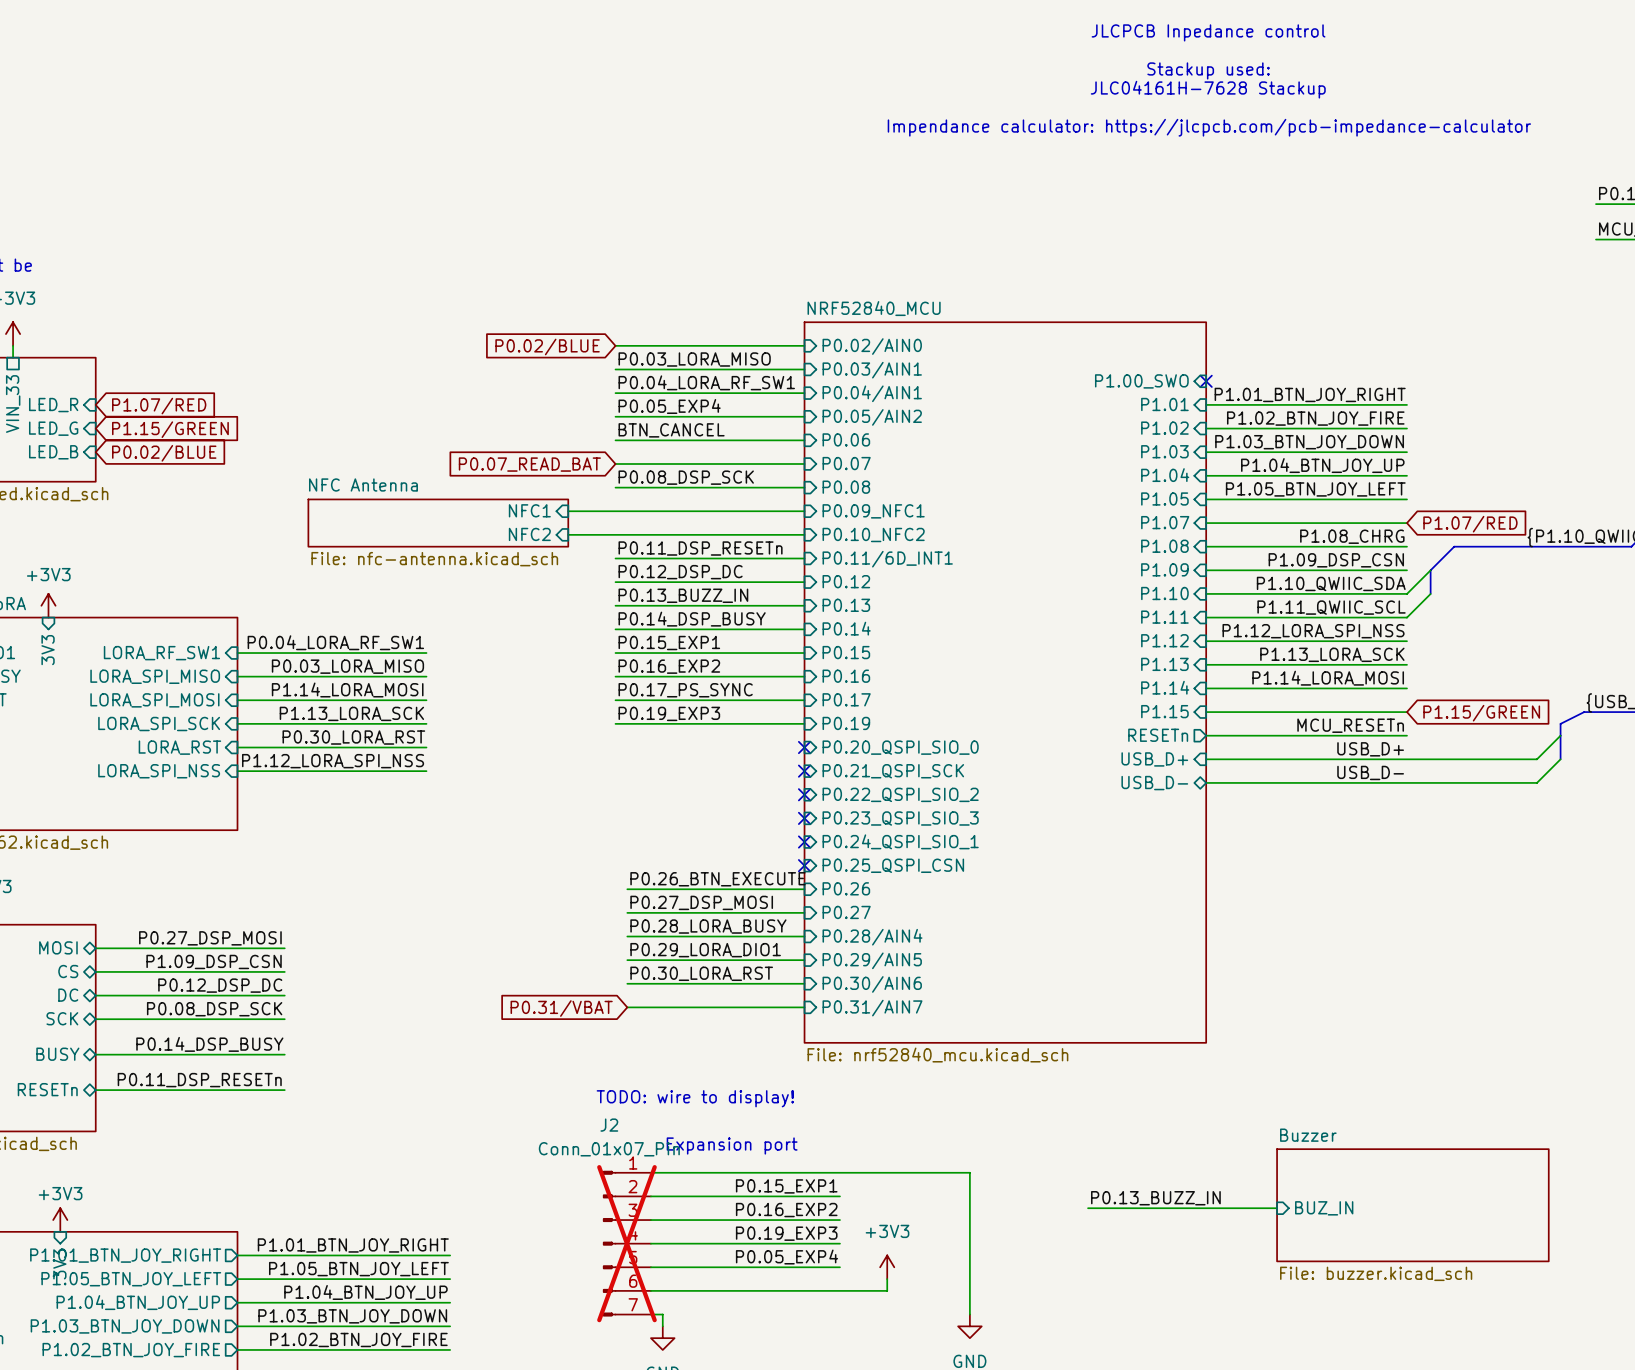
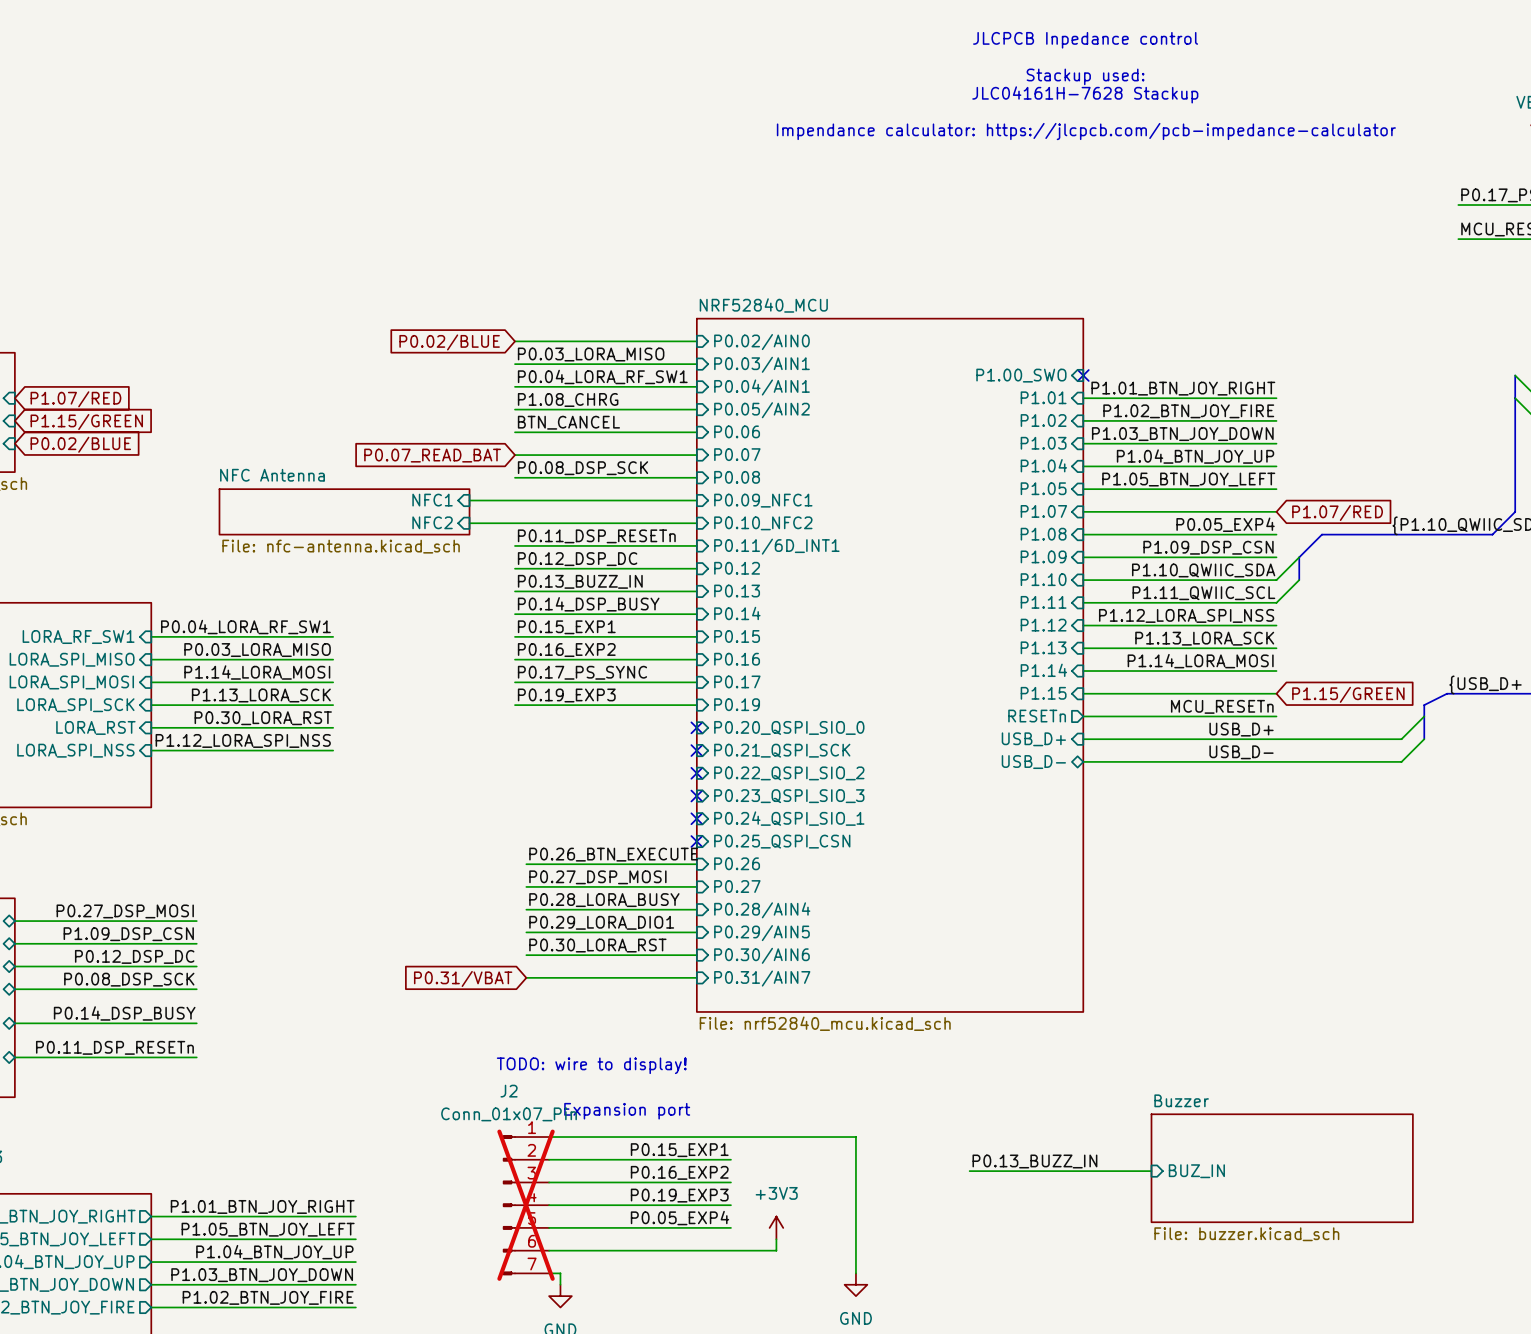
label: P0.05_EXP4 (669, 406) -> P1.08_CHRG (568, 399)
label: P1.08_CHRG (1352, 536) -> P0.05_EXP4 (1225, 524)

